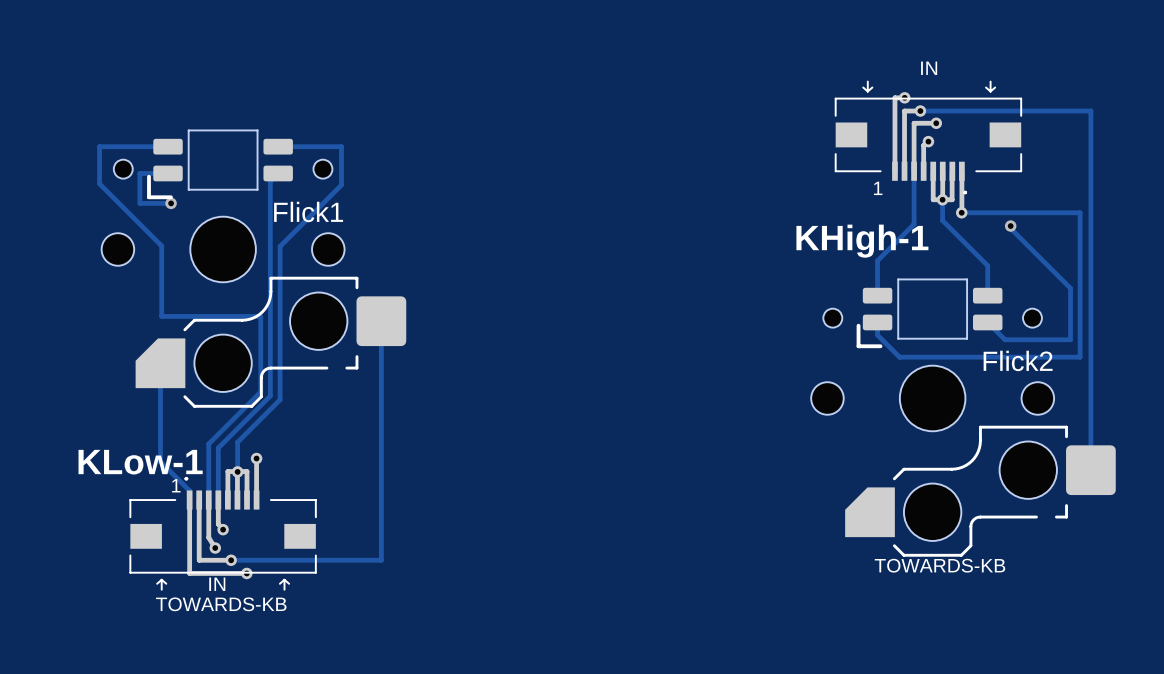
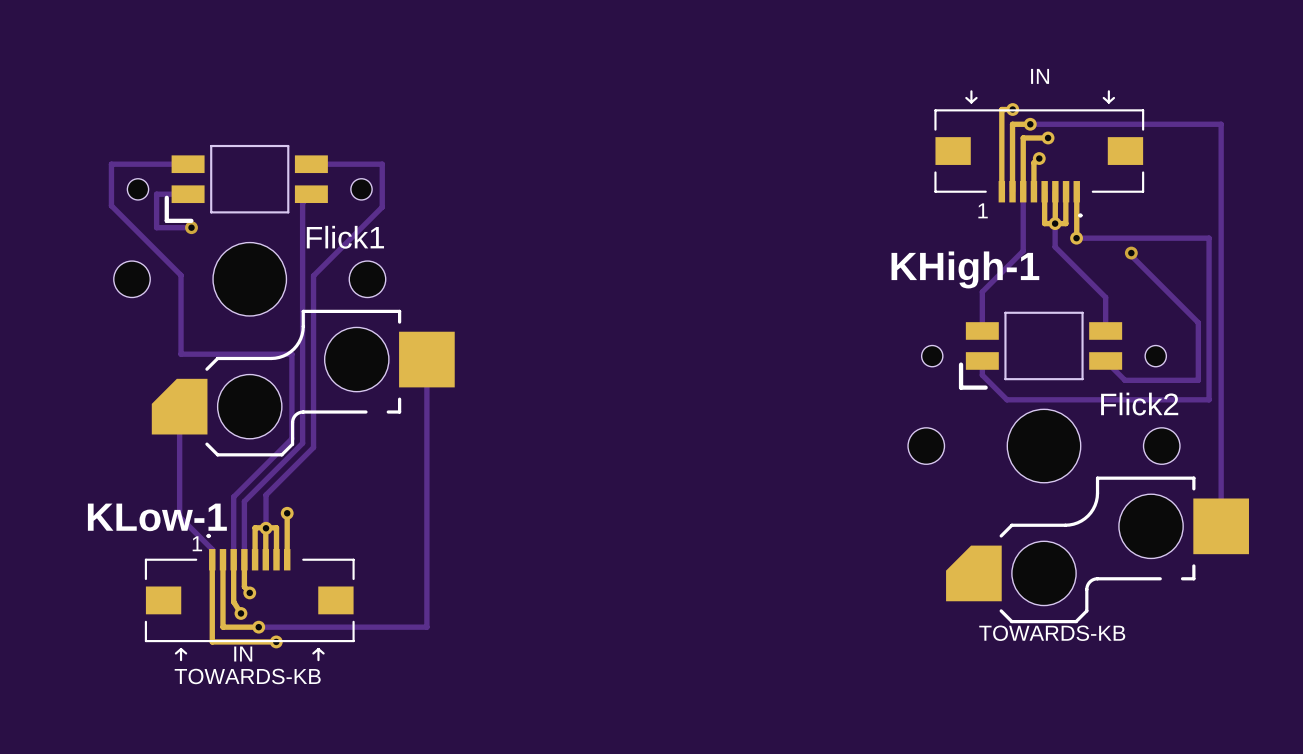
Flick1 footprint: [101, 129, 407, 408] -> [113, 144, 455, 457]
Flick2 footprint: [811, 278, 1116, 557] -> [908, 311, 1249, 624]

